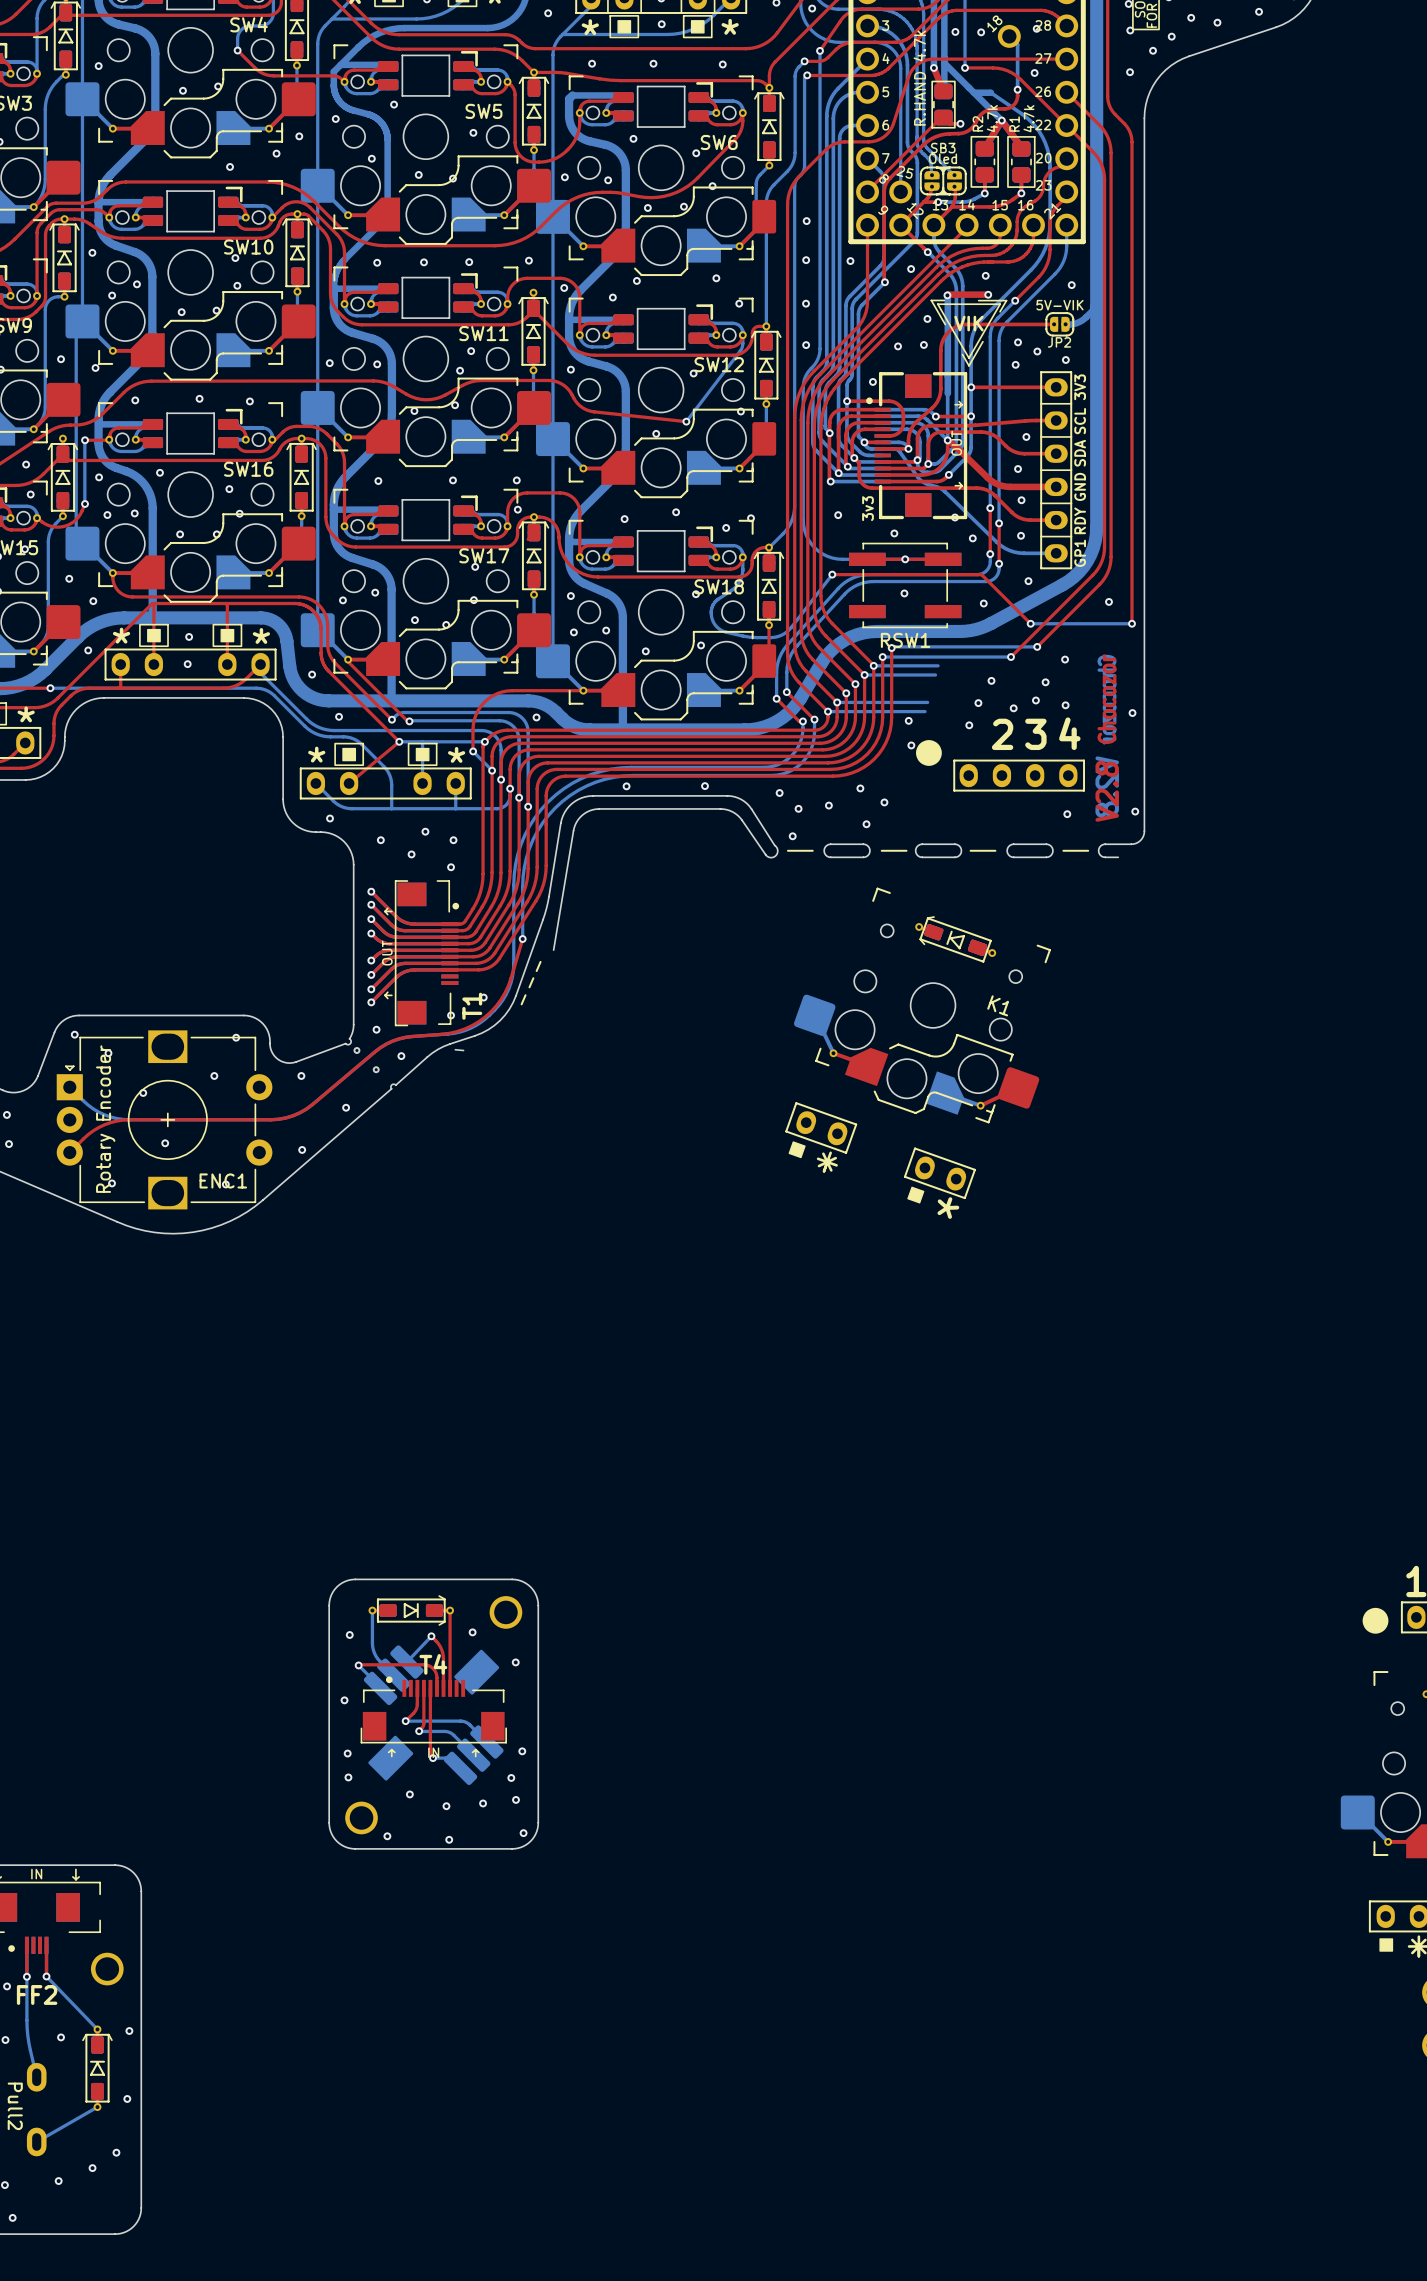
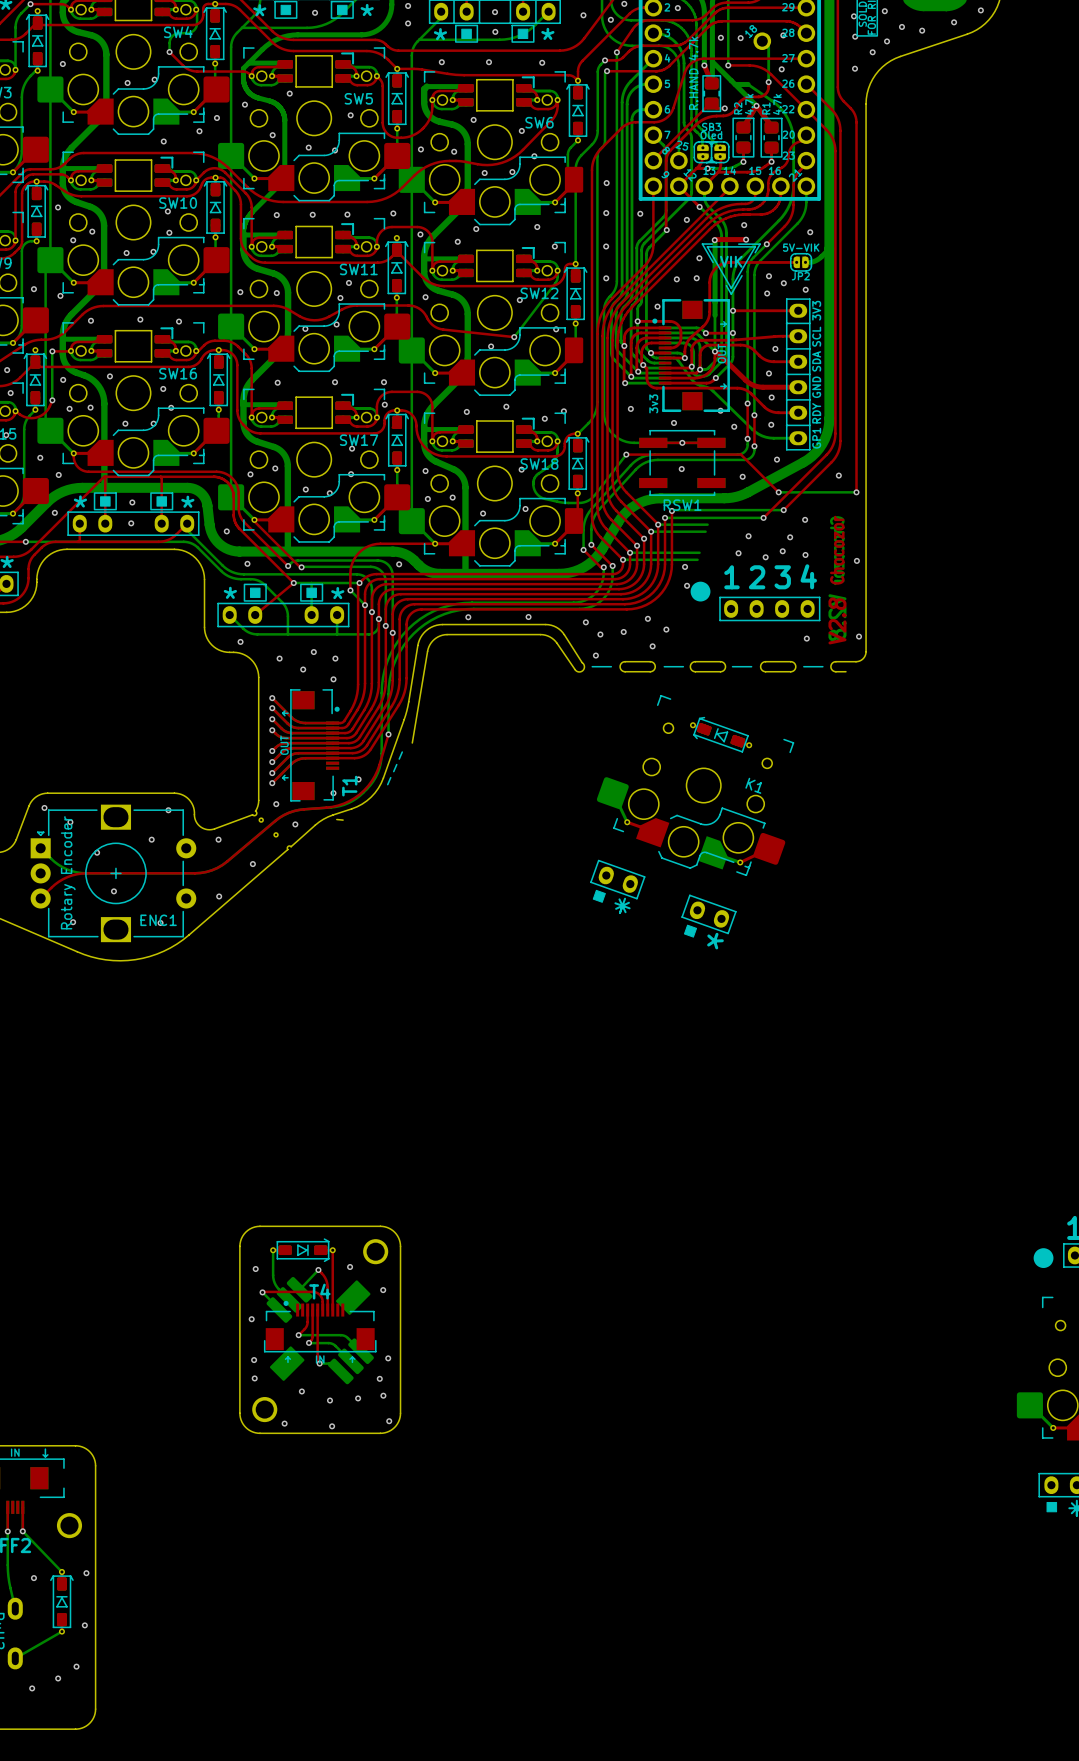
via: (969, 725) -> none
part text: none -> 1 (731, 577)

